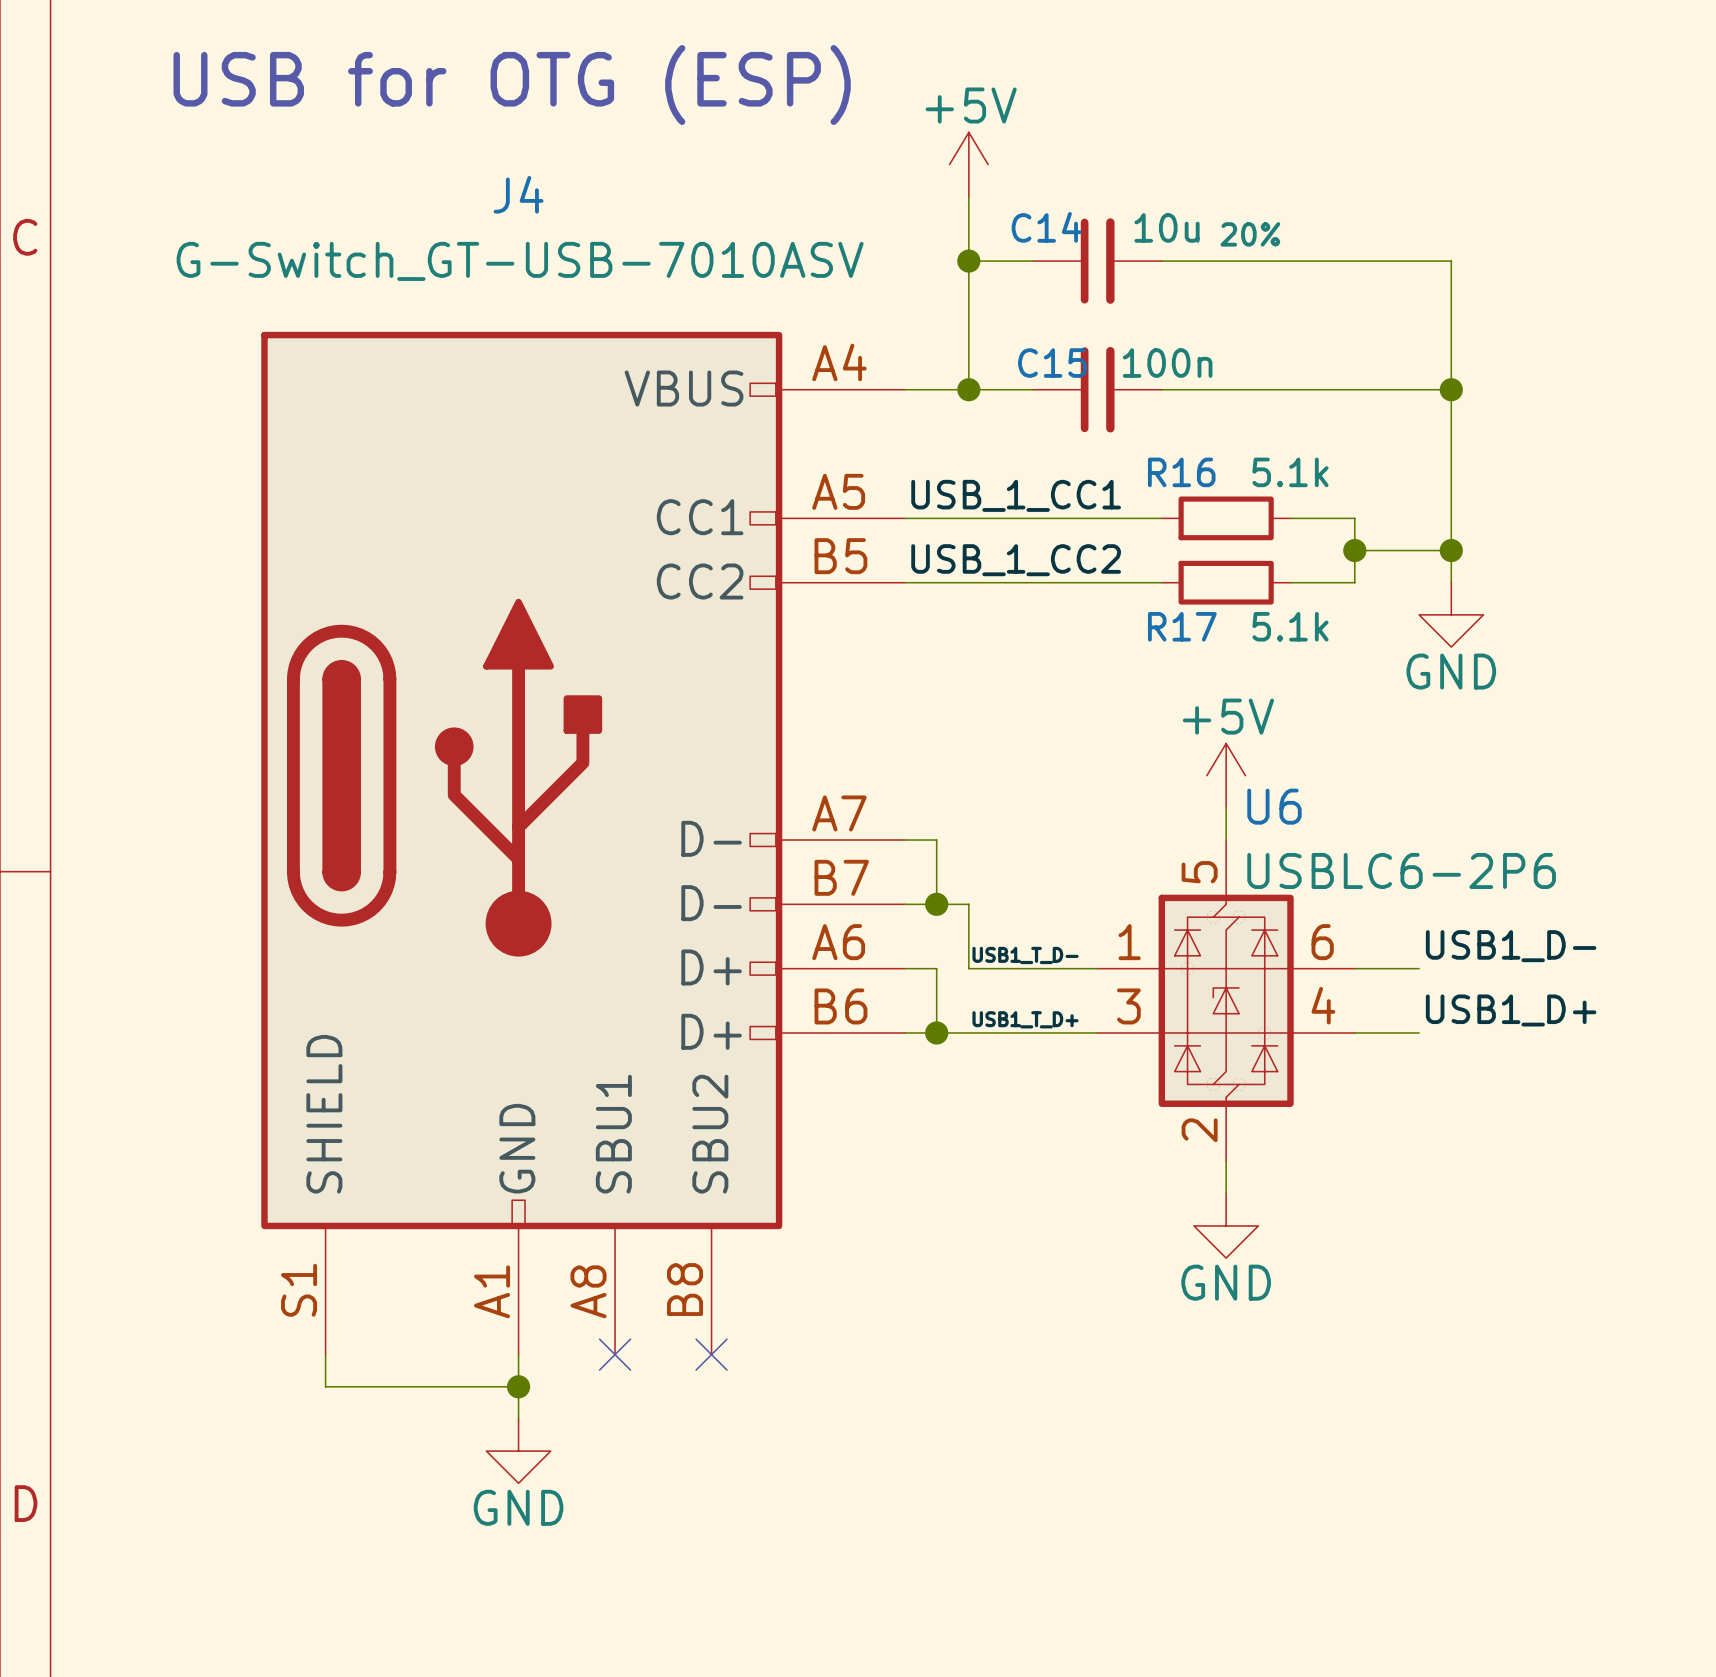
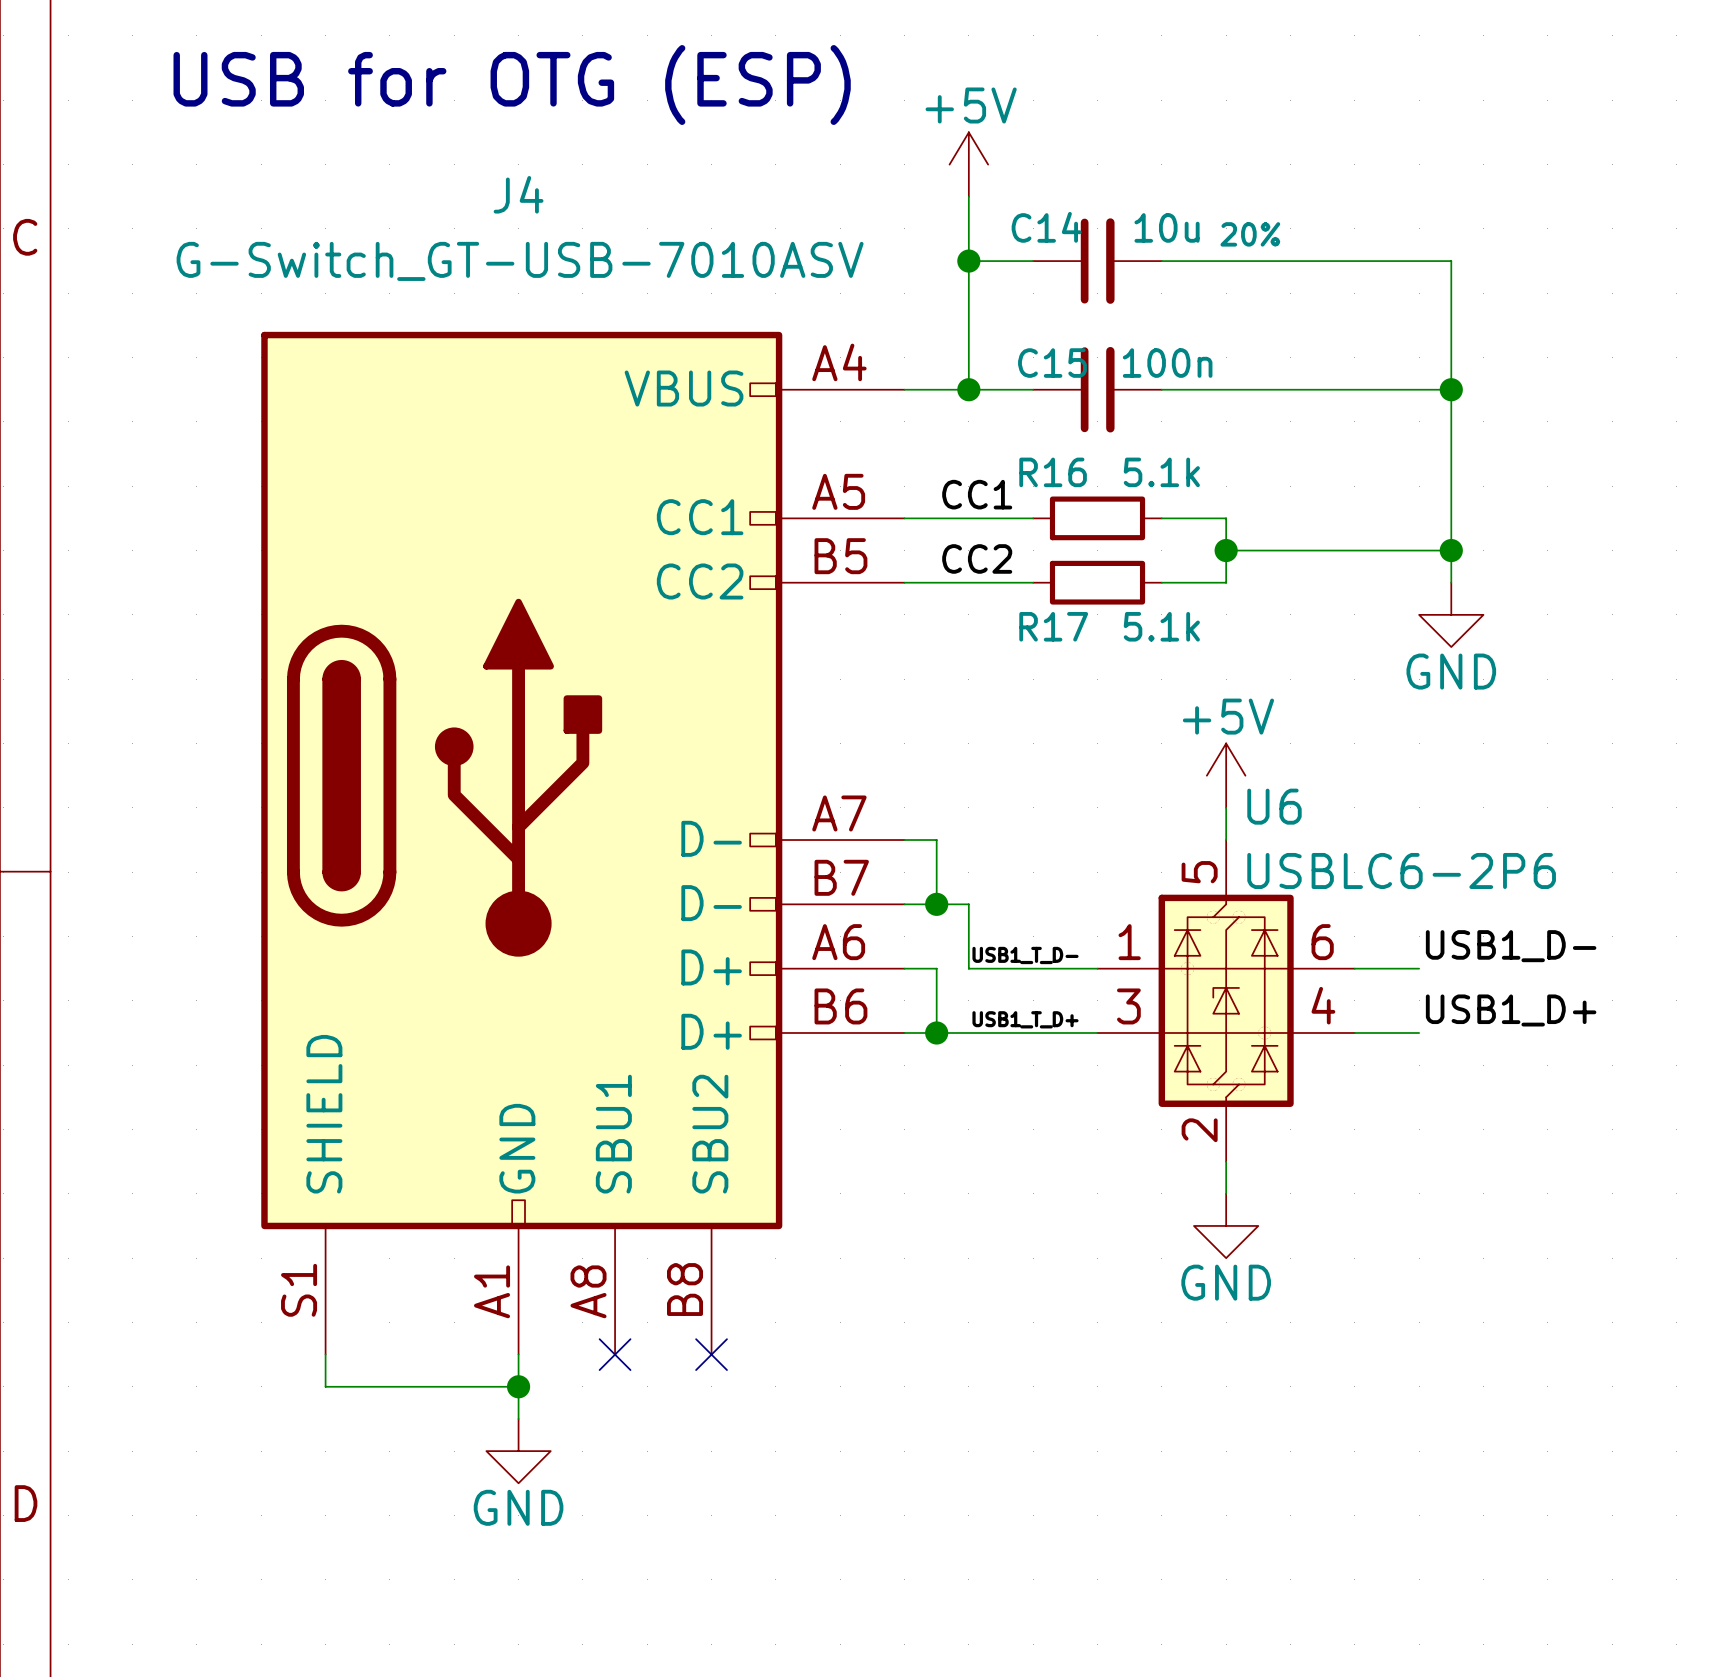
label: none -> CC1 (977, 494)
label: USB_1_CC1 (1016, 495) -> none
wire: (1033, 518) (1161, 518) -> (1161, 582) (1226, 582) (1226, 518) (1161, 518)
R16 position: (1226, 518) -> (1097, 518)
wire: (1290, 518) (1354, 518) (1354, 582) (1290, 582) -> none
junction position: (1354, 550) -> (1226, 550)
label: none -> CC2 (977, 558)
label: USB_1_CC2 (1016, 560) -> none
wire: (1033, 582) (1161, 582) -> (1226, 550) (1354, 550)
R17 position: (1226, 582) -> (1097, 582)

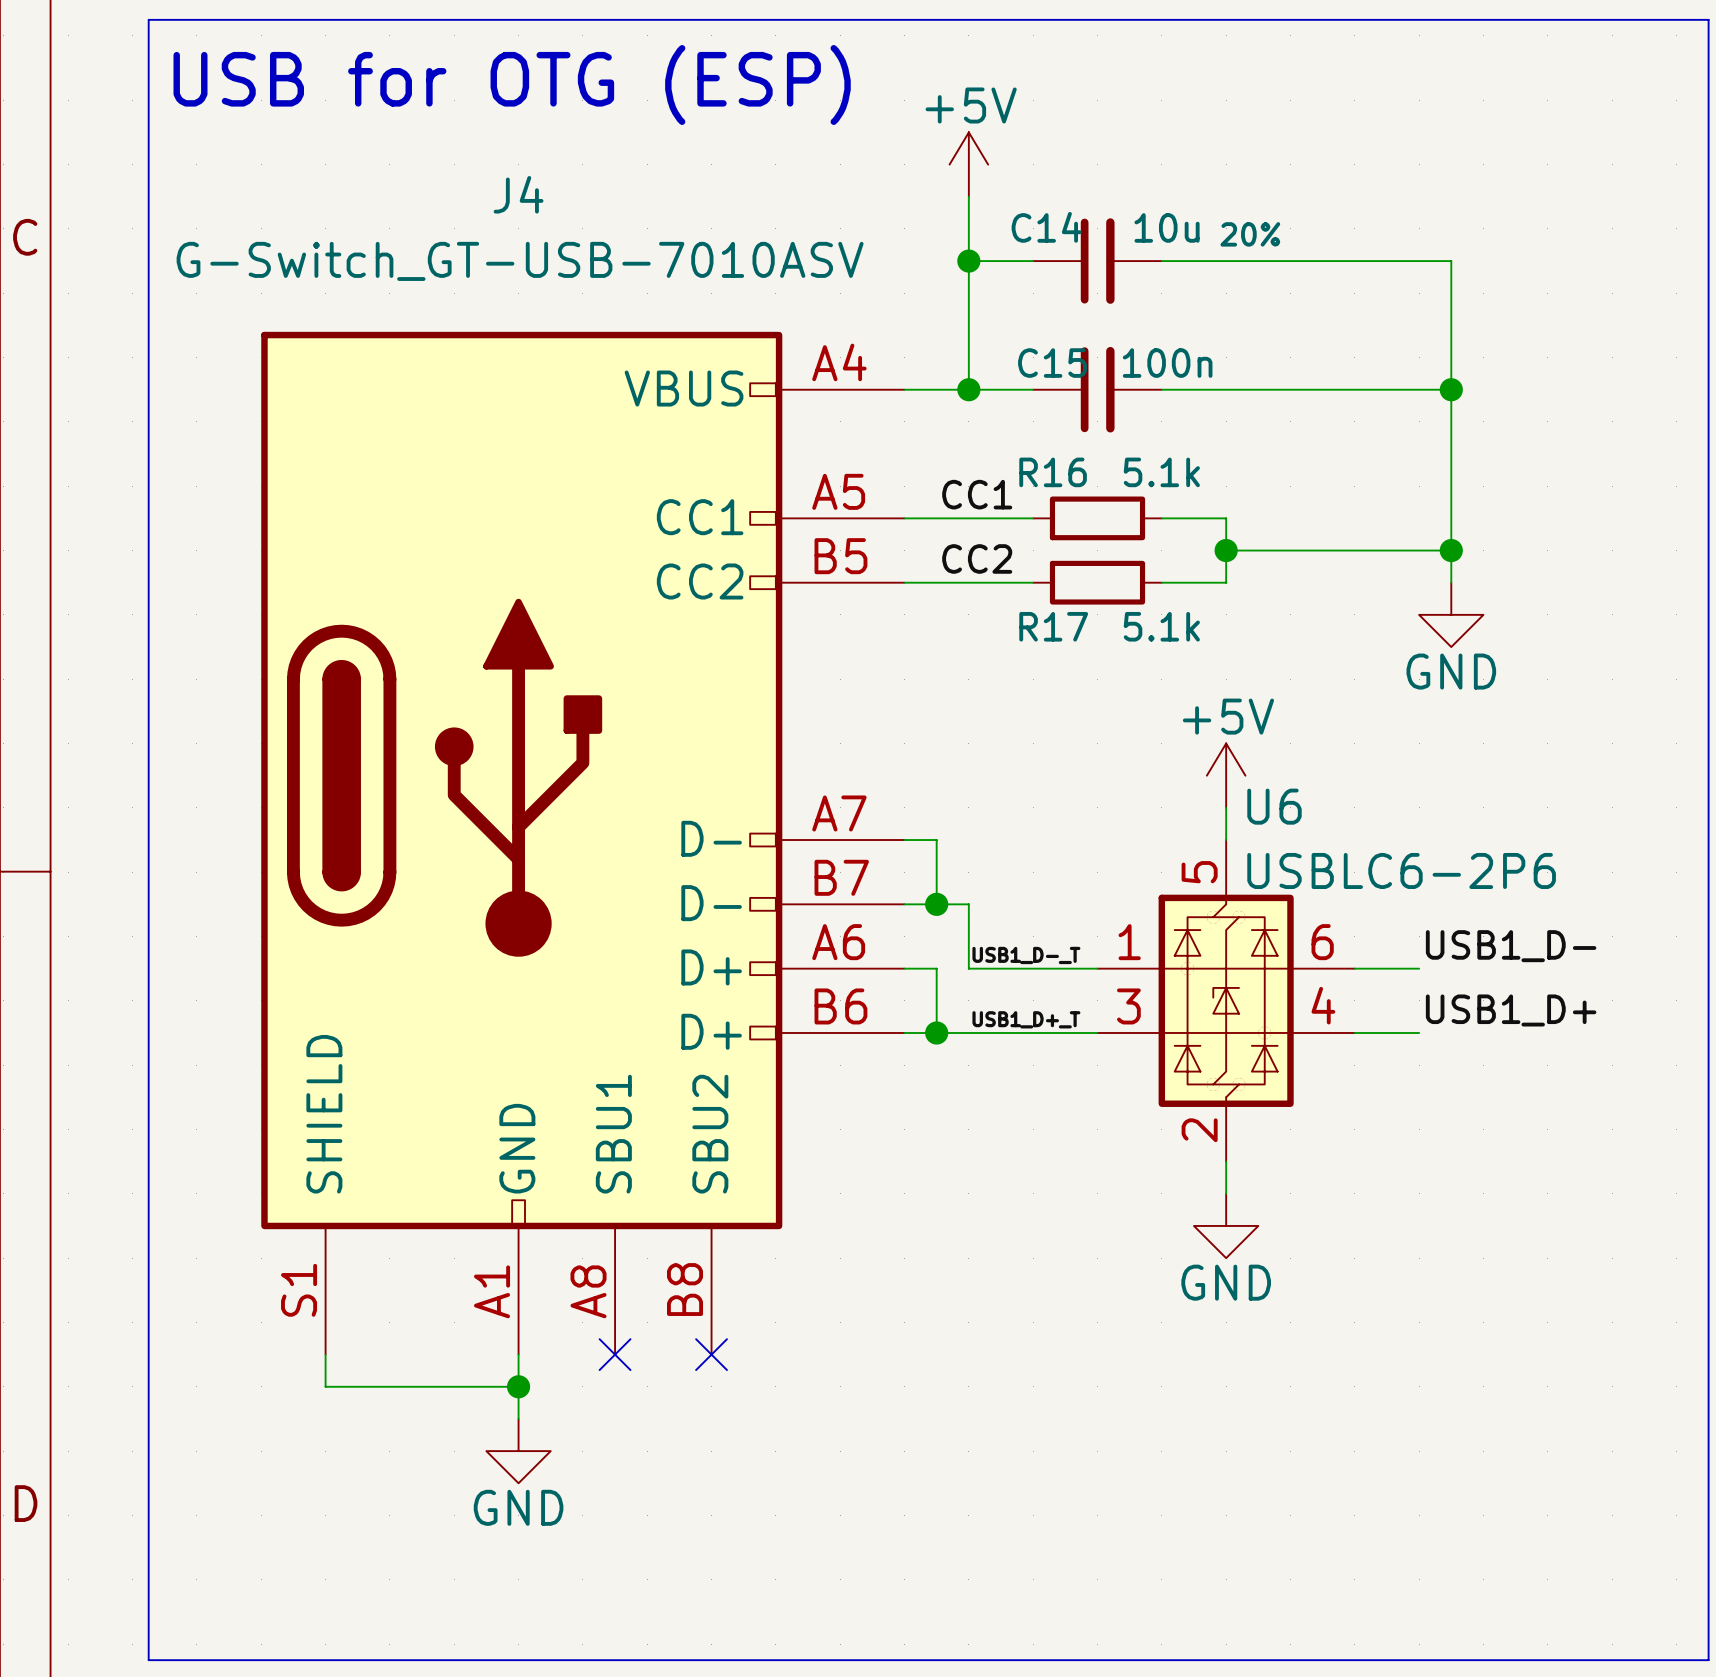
line: none -> (148, 19) (1708, 19) (1708, 1660) (148, 1660) (148, 19)
label: USB1_T_D- (1025, 955) -> USB1_D-_T (1026, 955)
label: USB1_T_D+ (1025, 1019) -> USB1_D+_T (1026, 1019)

